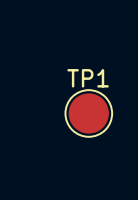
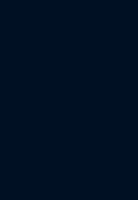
TP1: (88, 113) -> none

